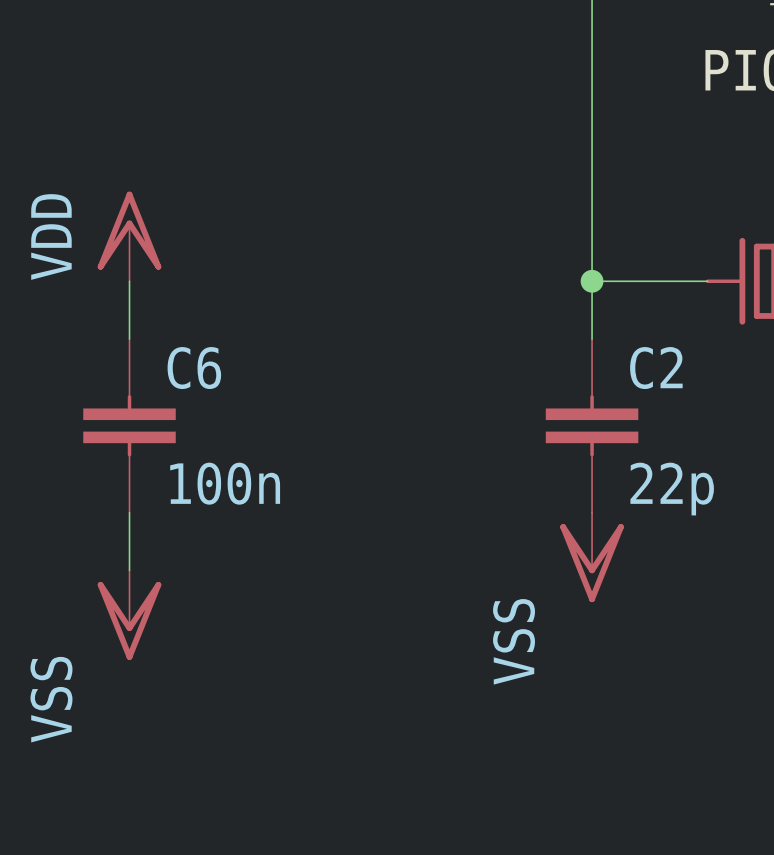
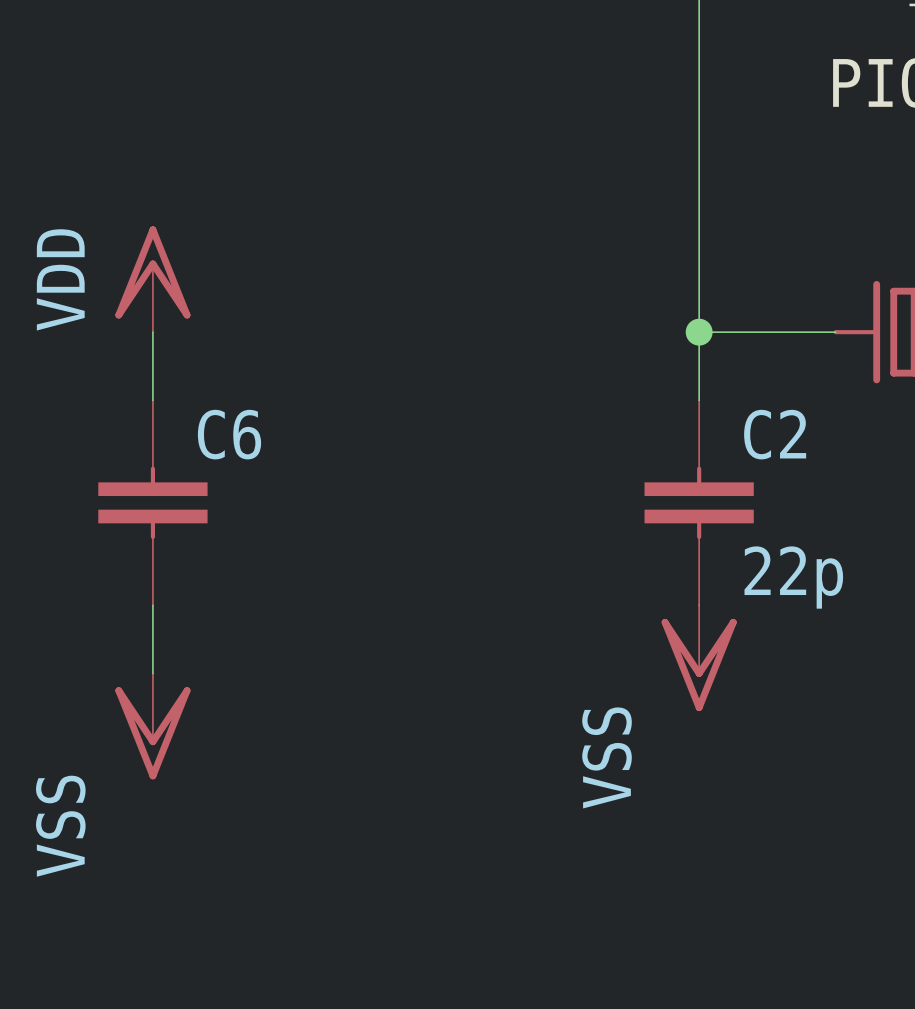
C6 value: 100n (225, 483) -> none

